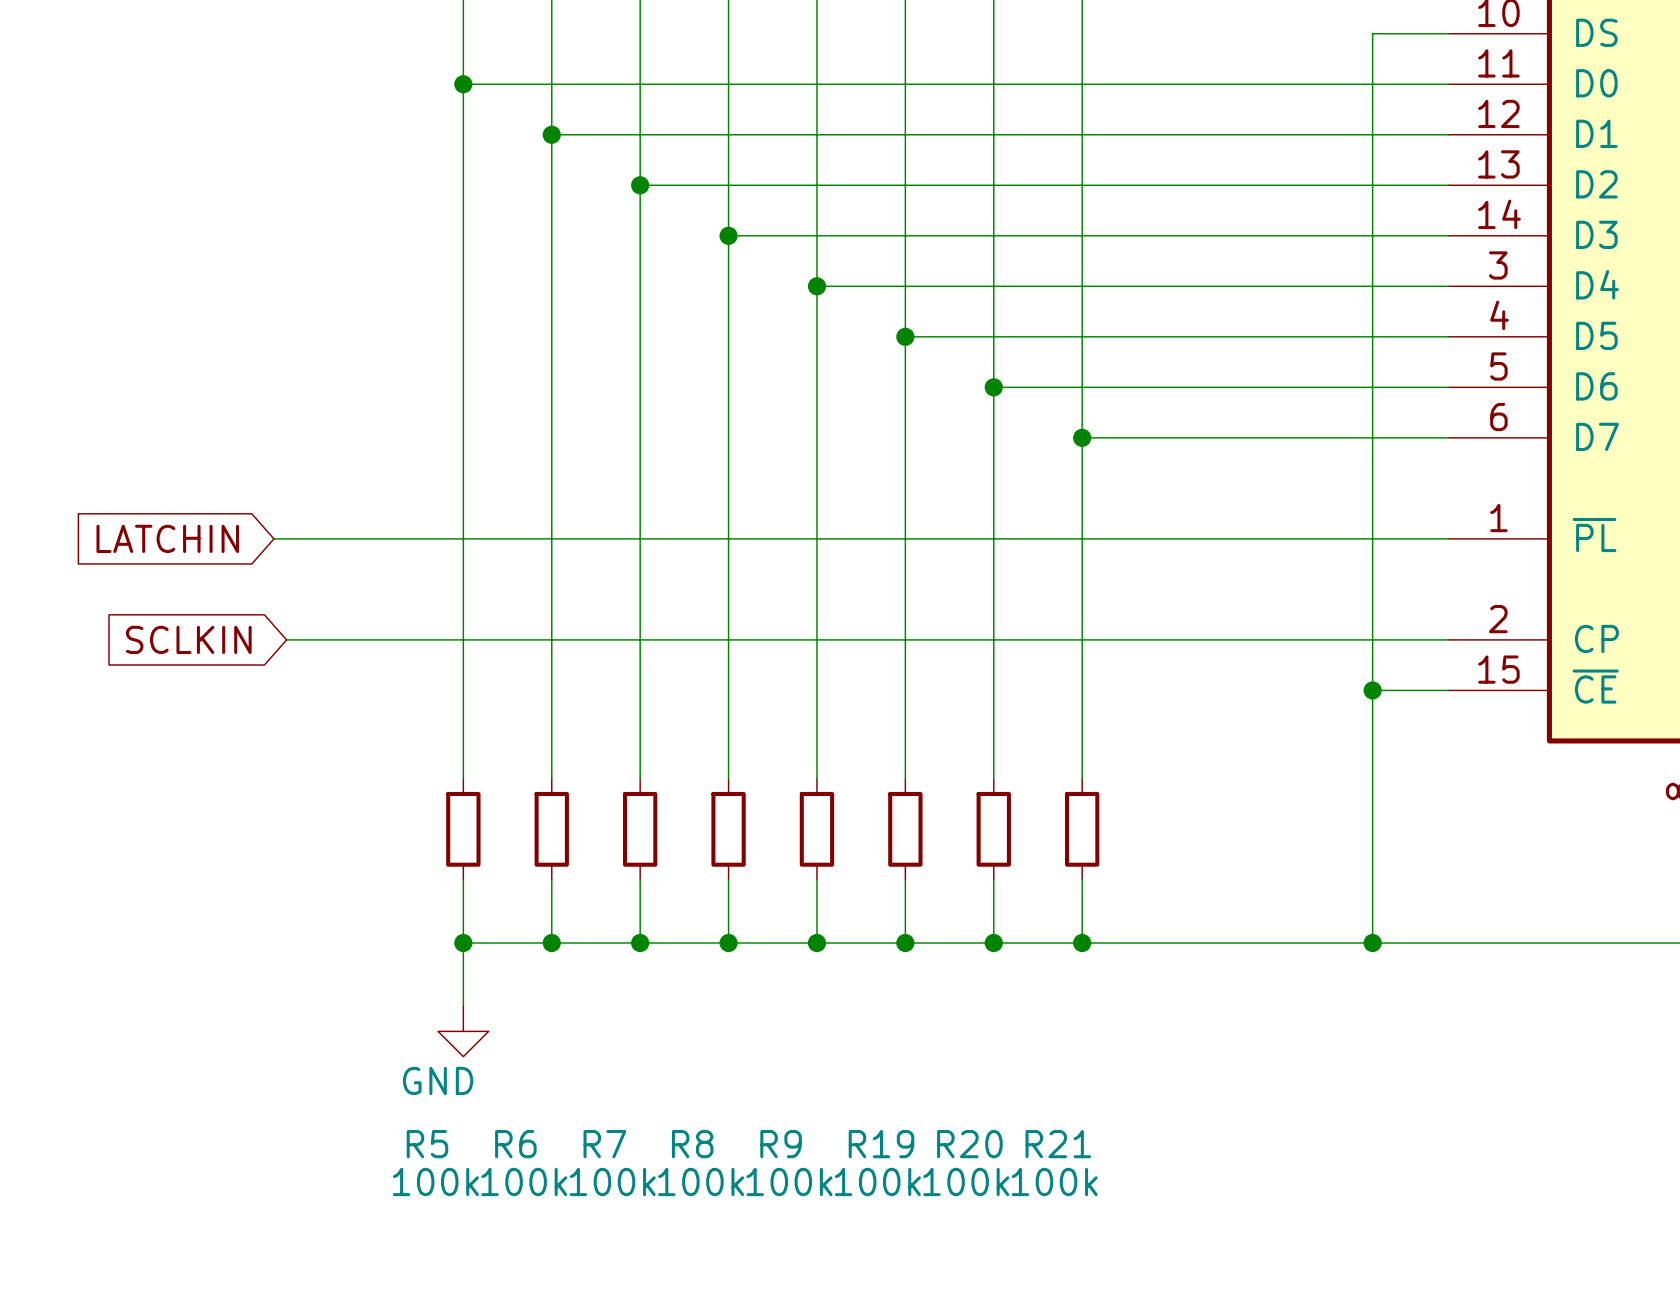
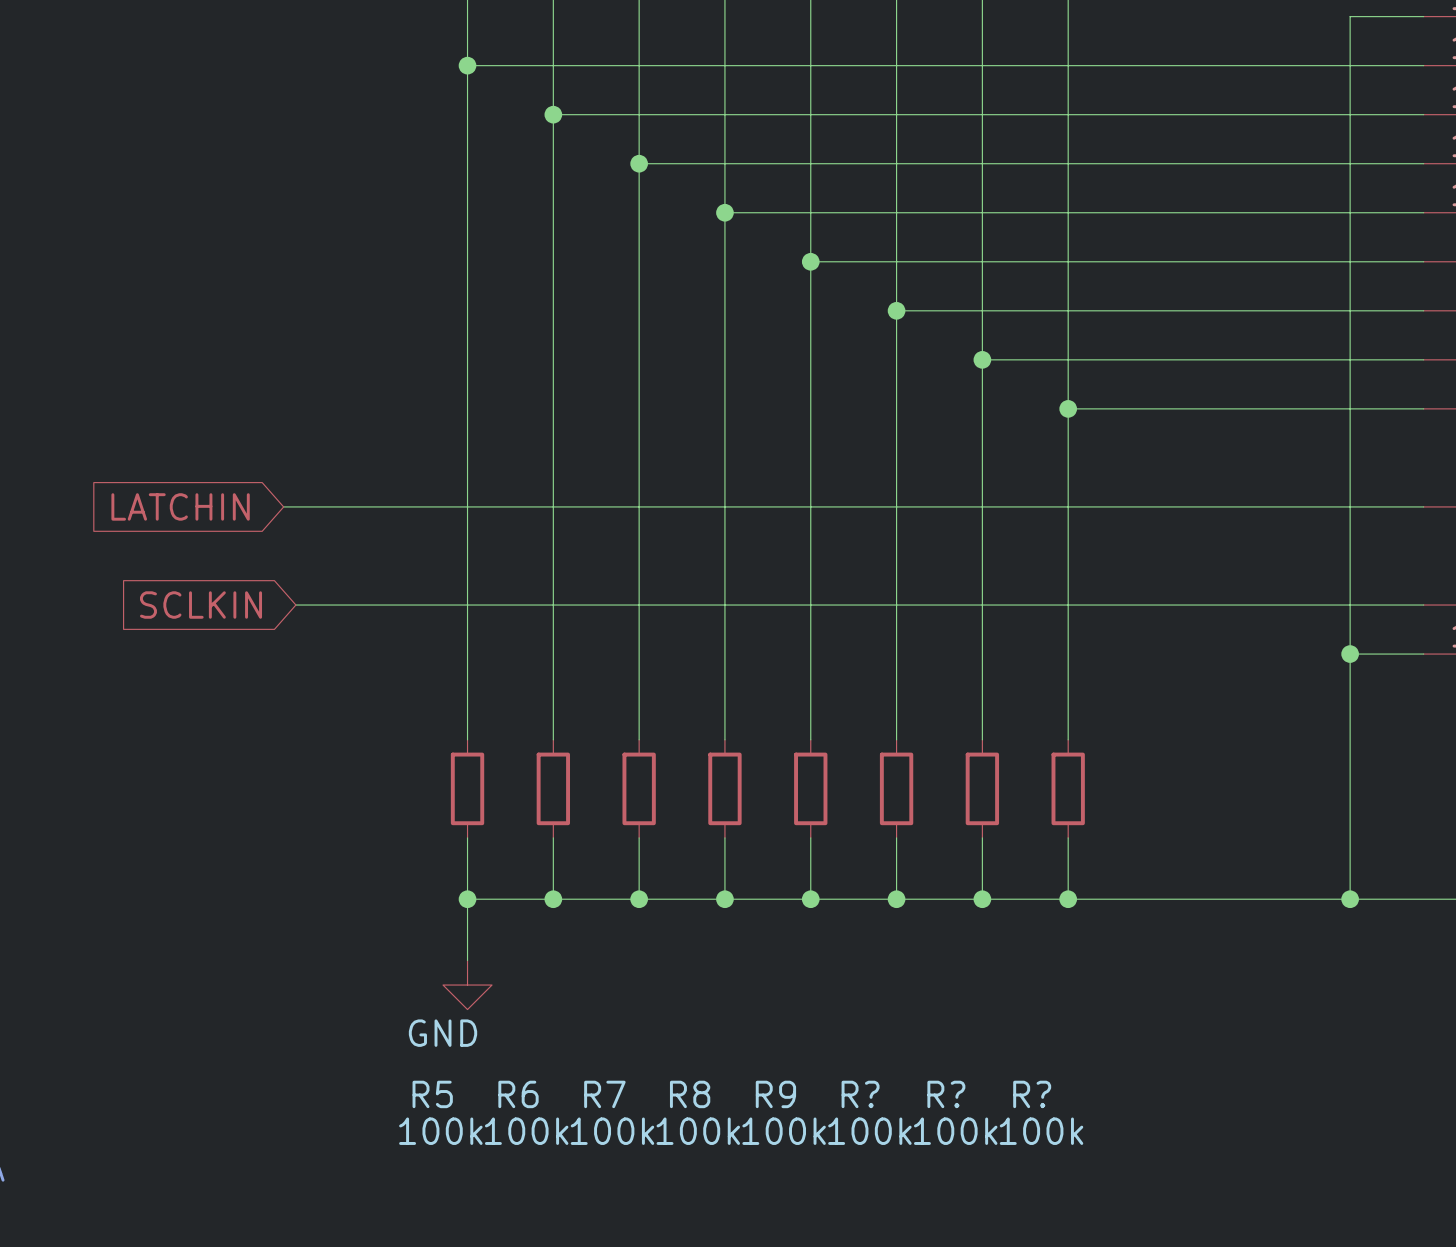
R19 name: R19 (881, 1144) -> R? (860, 1094)
R20 name: R20 (969, 1144) -> R? (946, 1094)
R21 name: R21 (1058, 1144) -> R? (1032, 1094)

